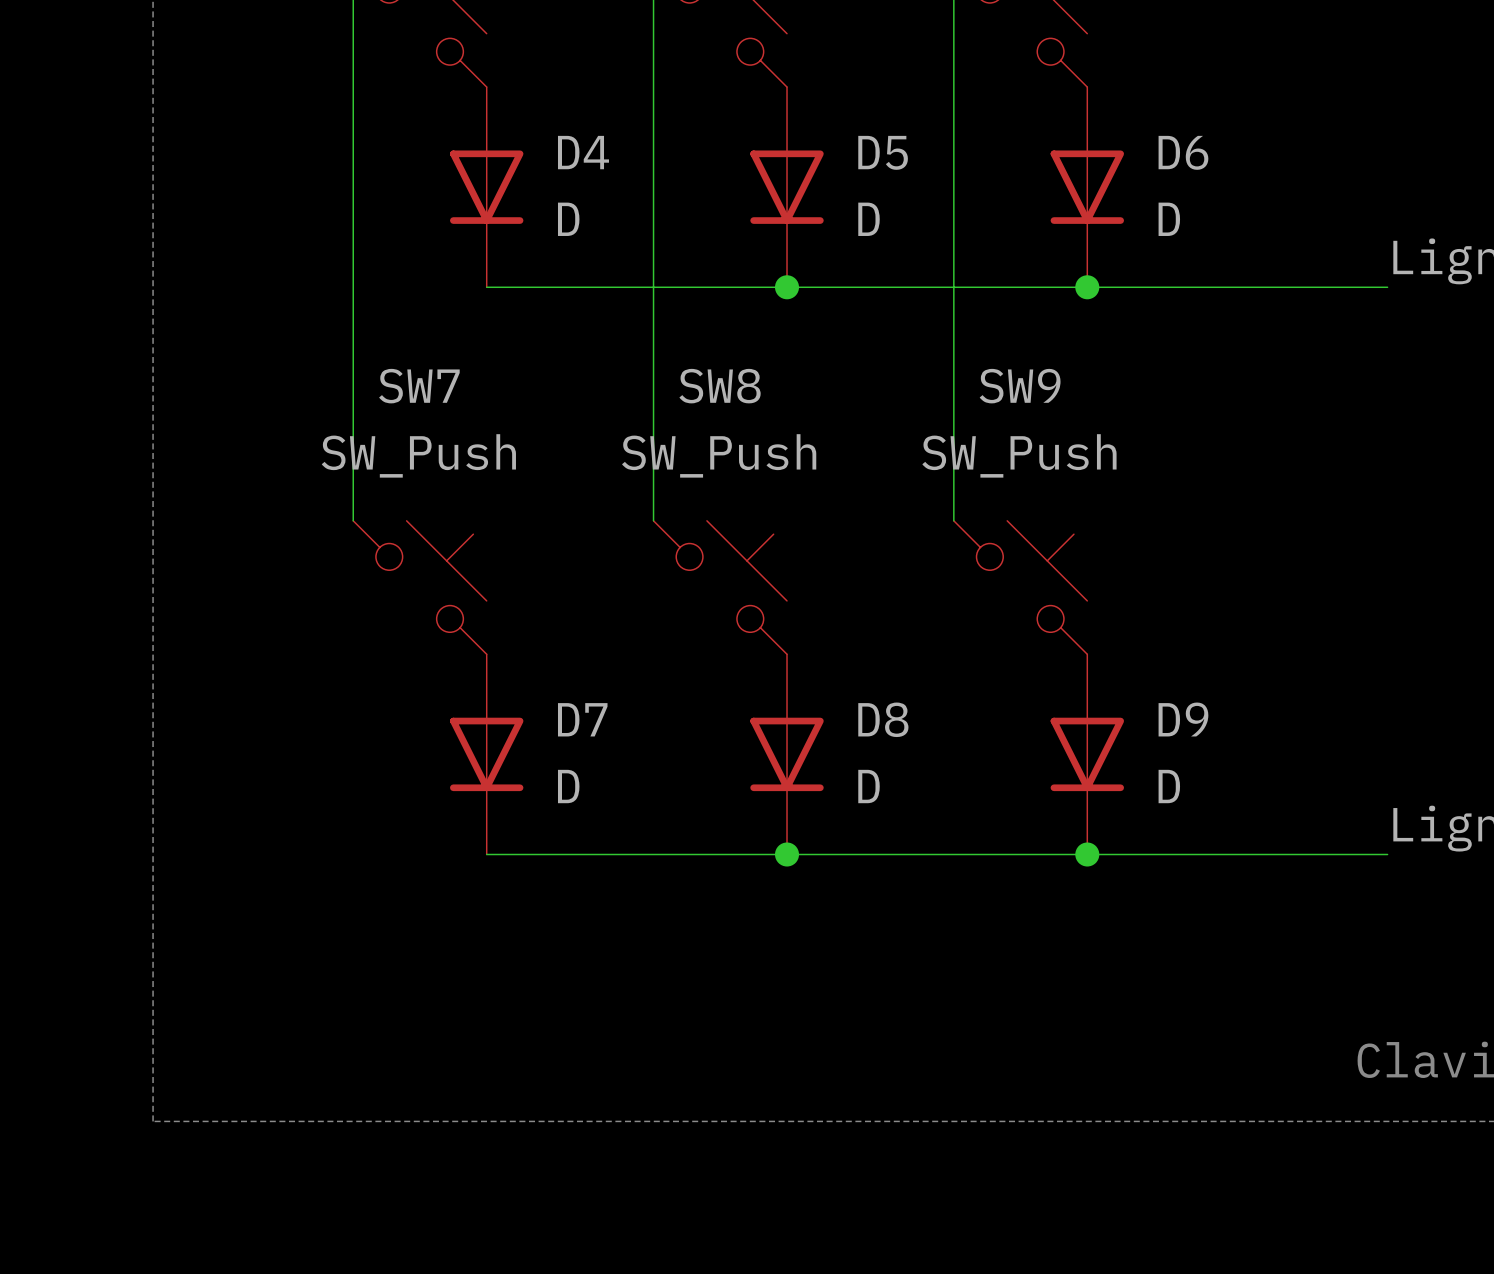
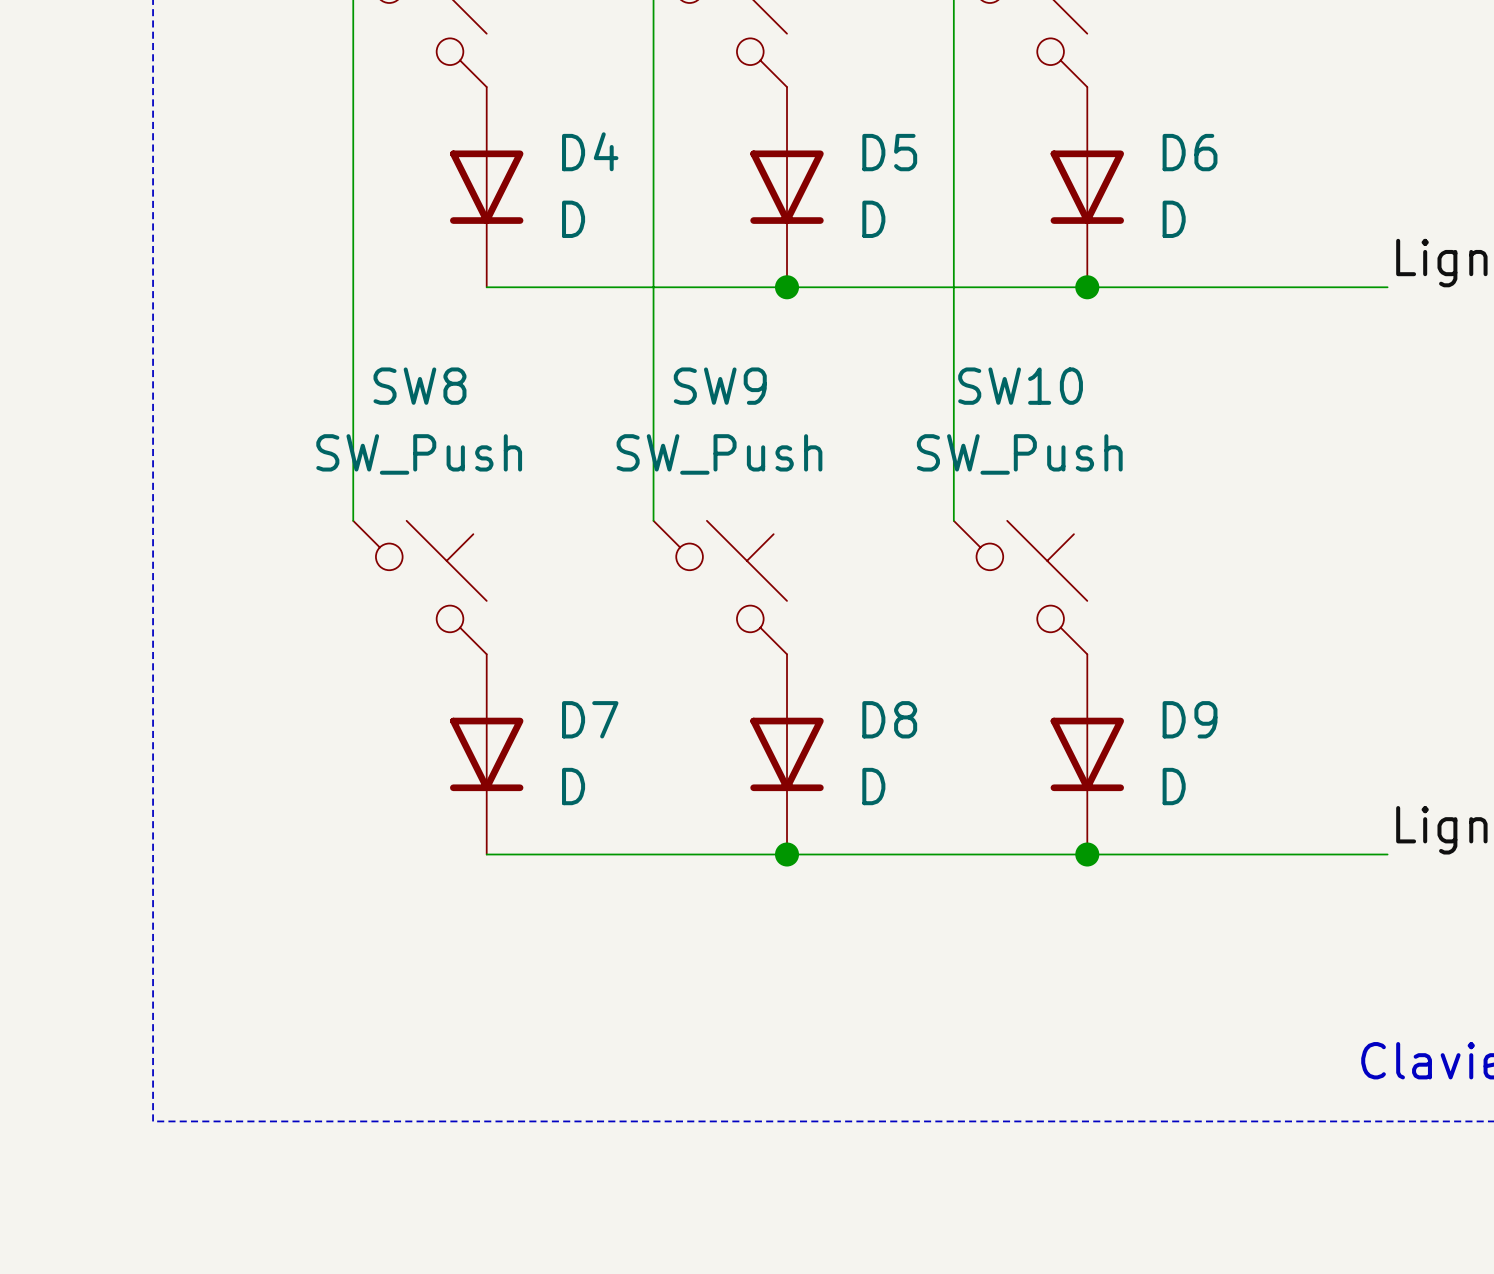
SW7 name: SW7 (419, 386) -> SW8 (419, 386)
SW8 name: SW8 (720, 386) -> SW9 (720, 386)
SW9 name: SW9 (1020, 386) -> SW10 (1020, 386)

